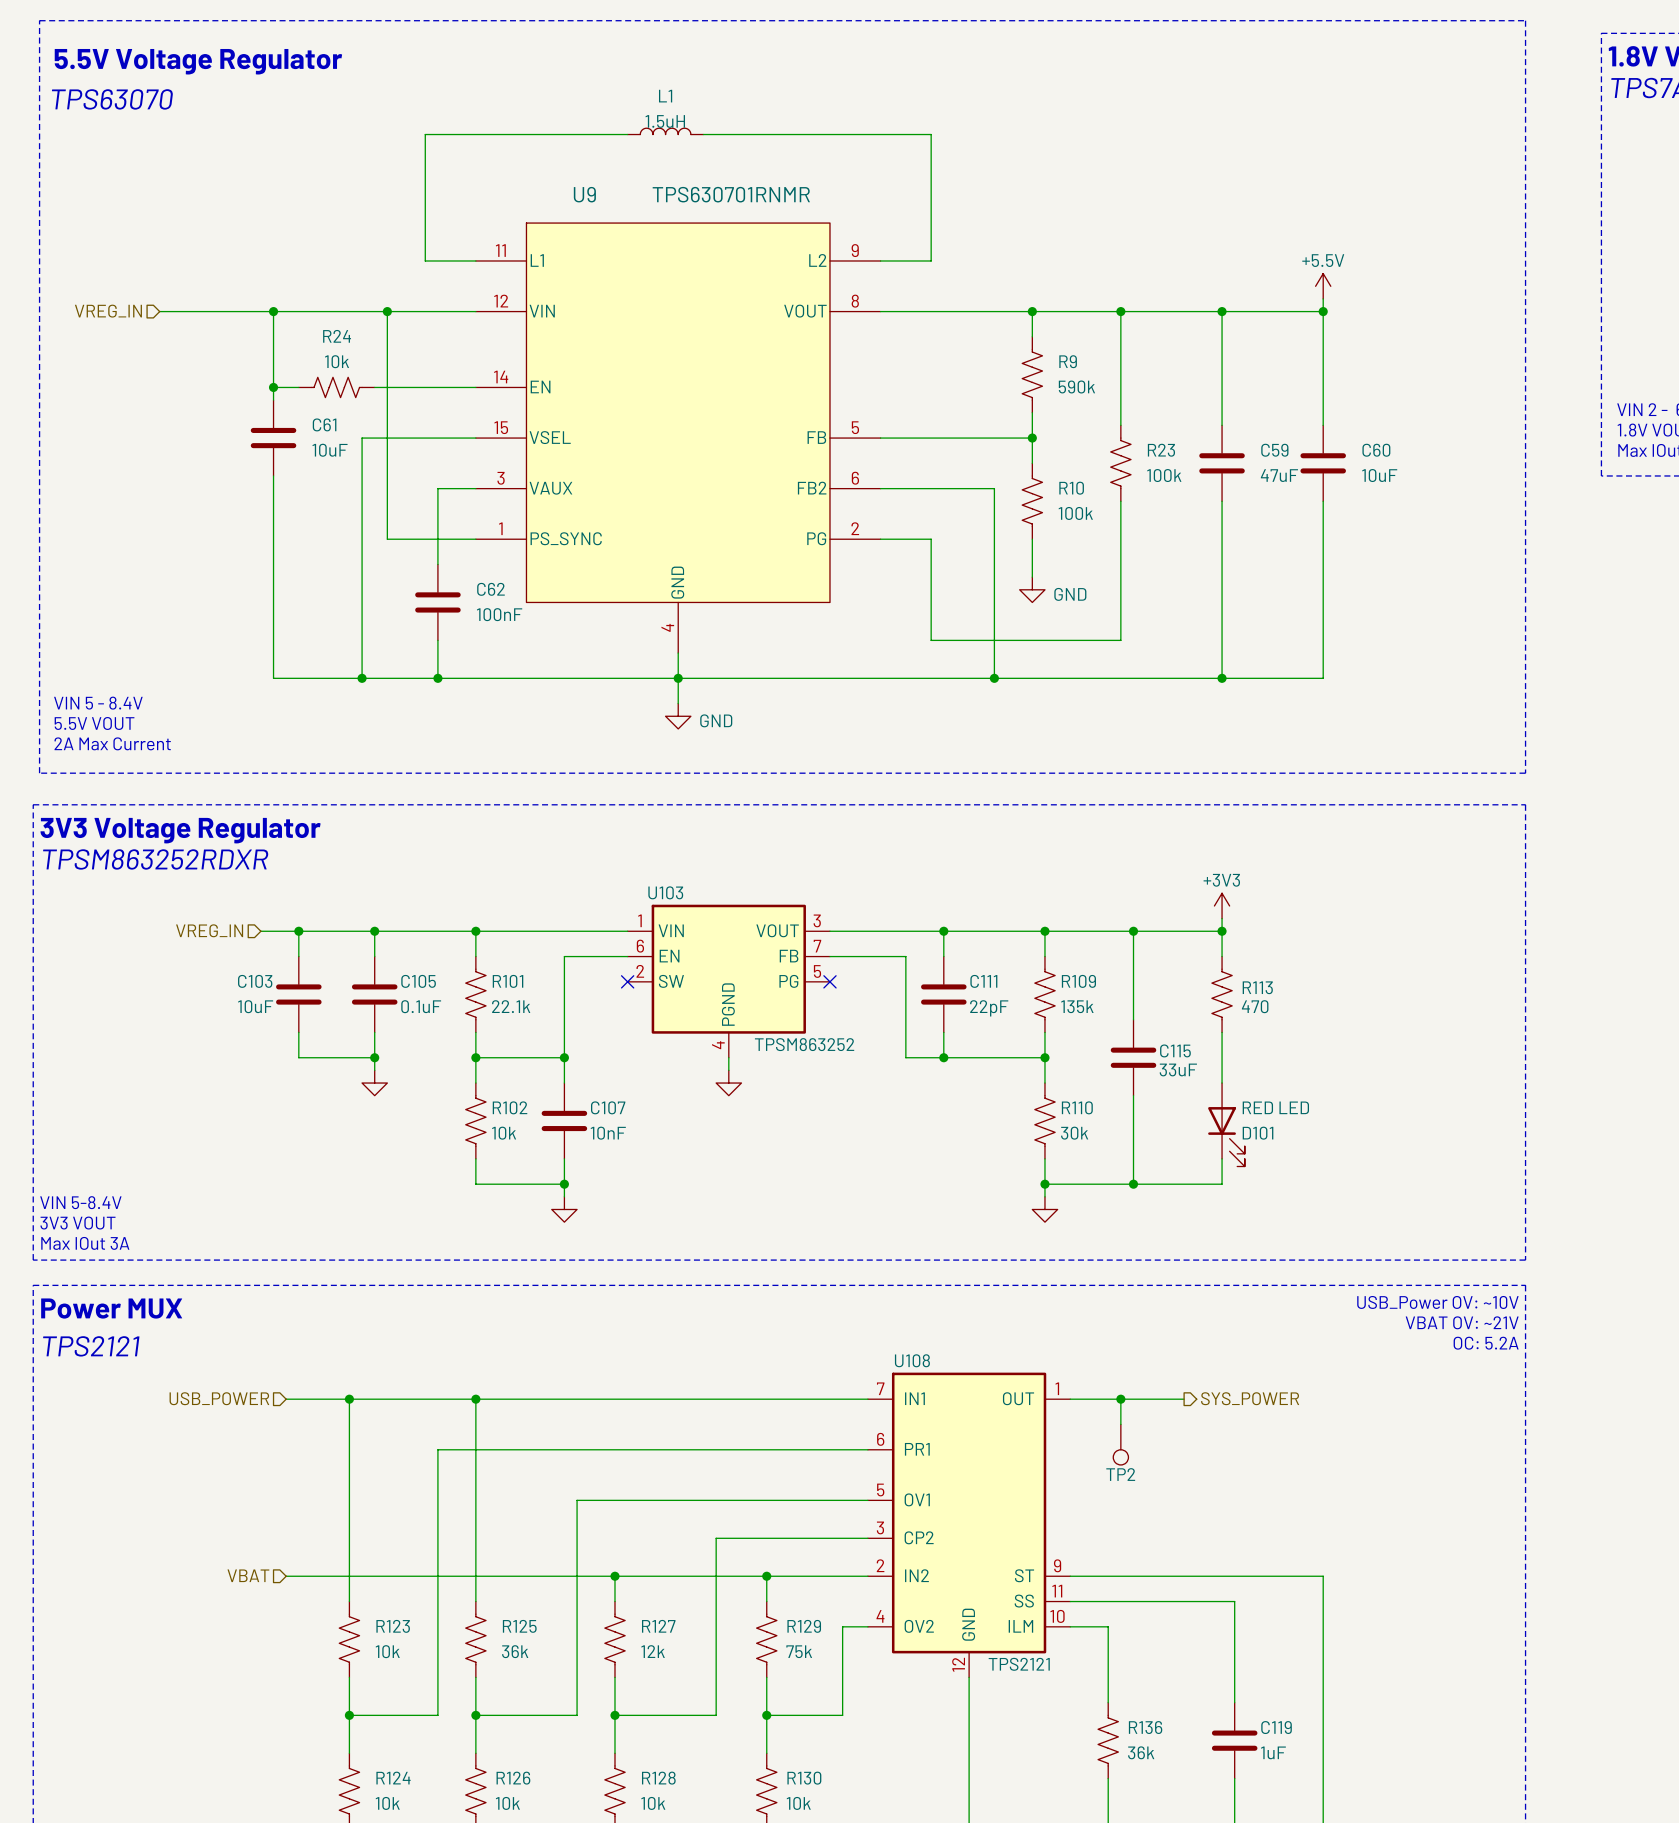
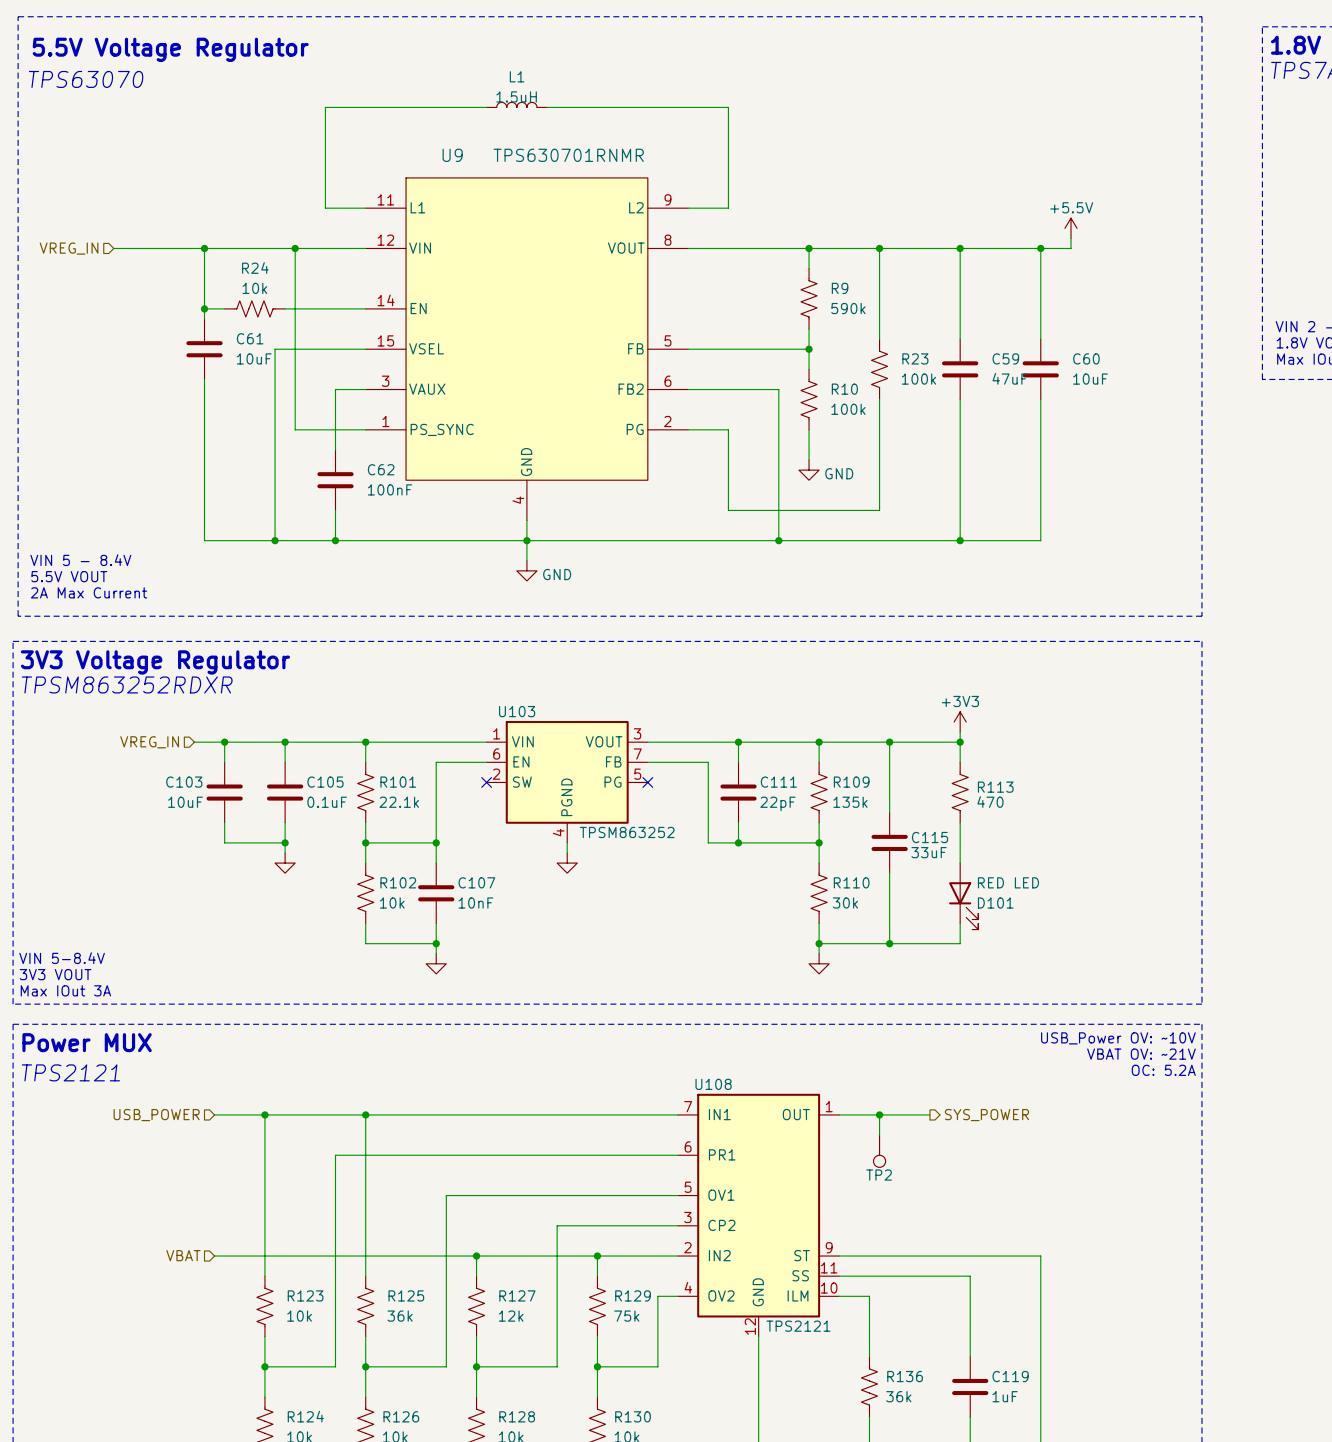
power symbol position: +5.5V (1323, 286) -> +5.5V (1071, 228)
wire: (1323, 298) (1323, 311) -> (1071, 238) (1071, 248) (1040, 248)

